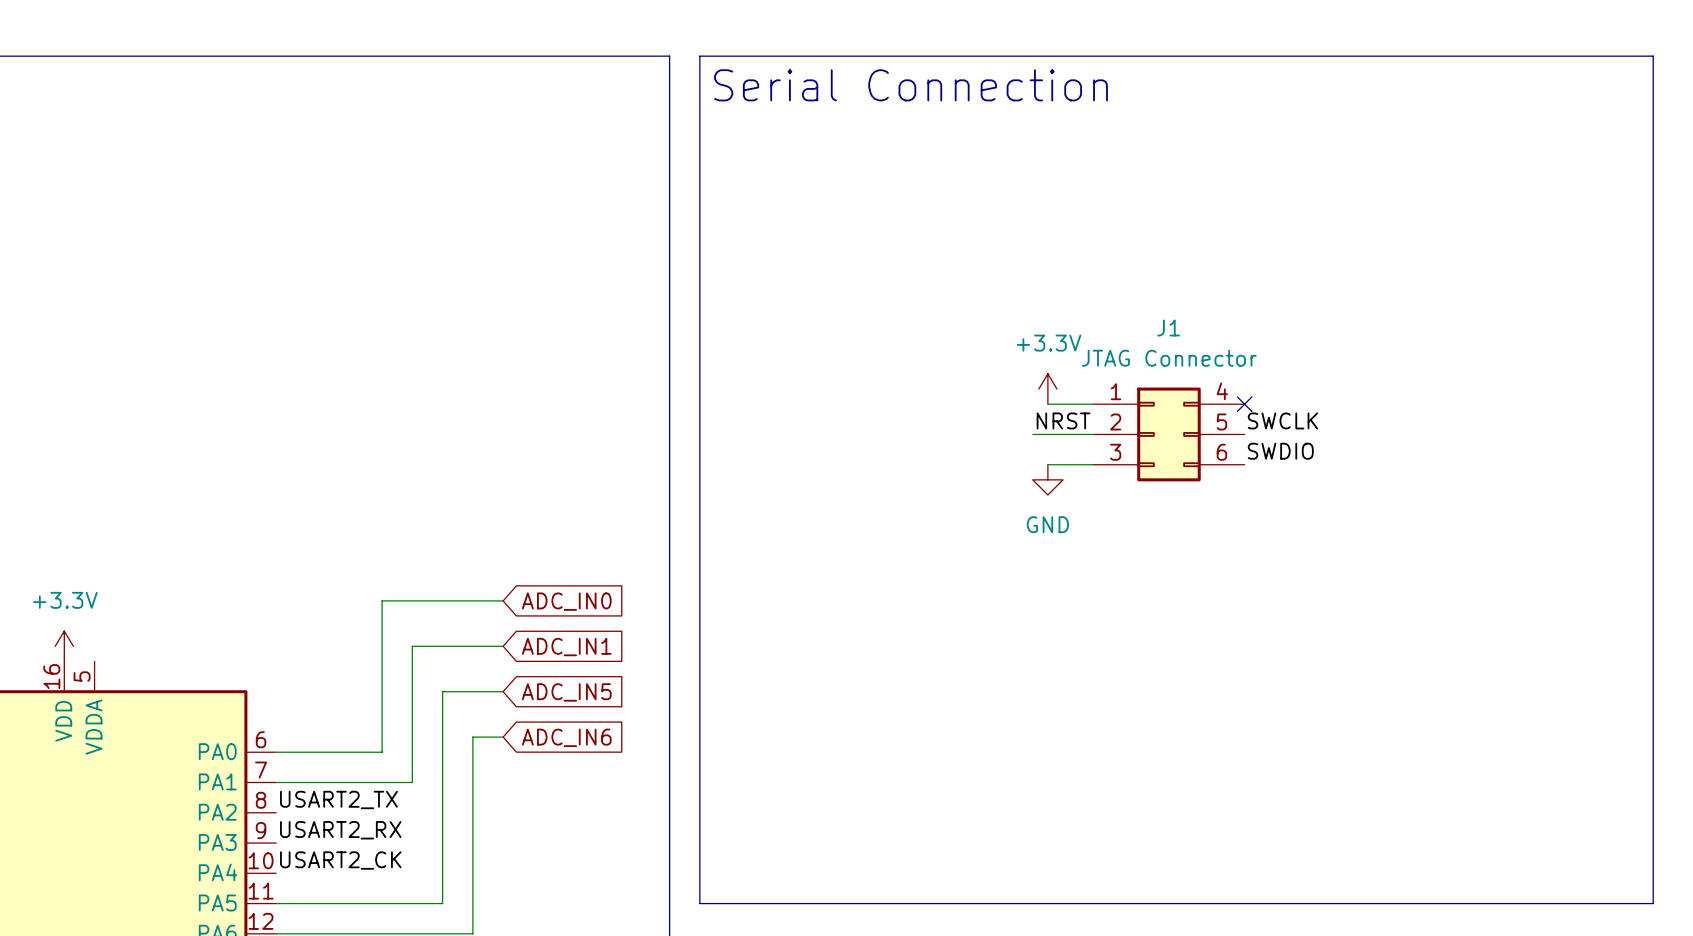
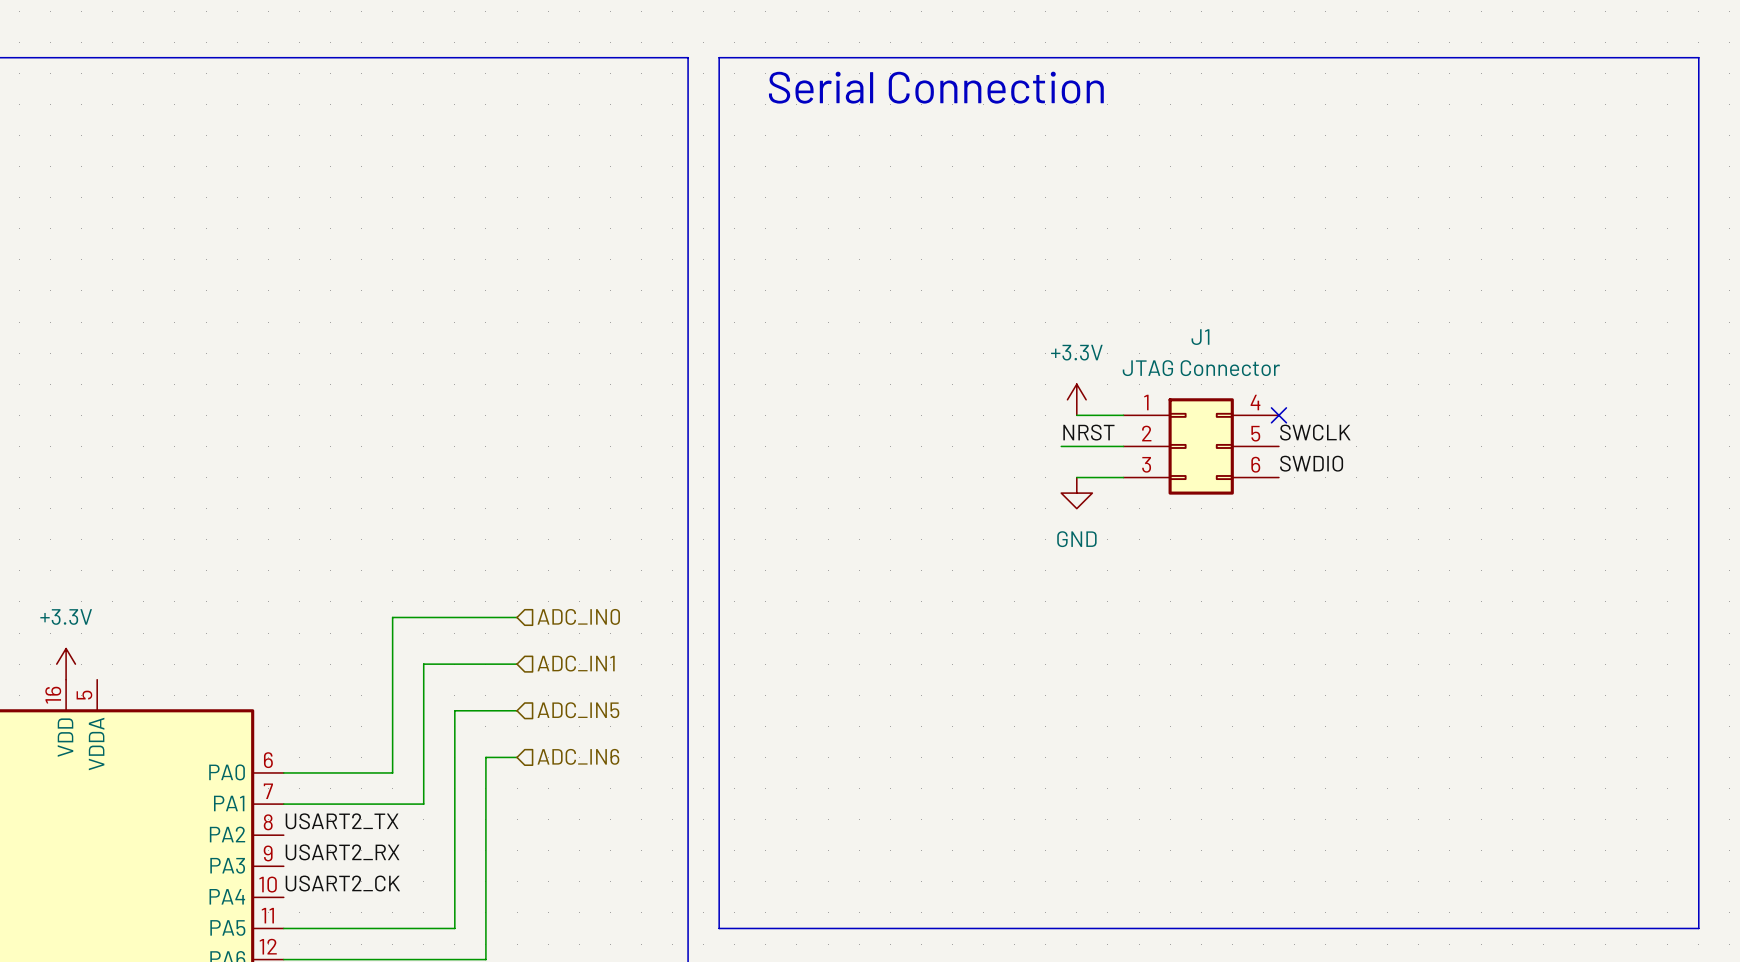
global label: ADC_IN0 (566, 601) -> none
hierarchical label: none -> ADC_IN0 (578, 616)
hierarchical label: none -> ADC_IN1 (576, 663)
global label: ADC_IN1 (566, 647) -> none
hierarchical label: none -> ADC_IN5 (578, 710)
global label: ADC_IN5 (566, 692) -> none
global label: ADC_IN6 (566, 737) -> none
hierarchical label: none -> ADC_IN6 (578, 756)

